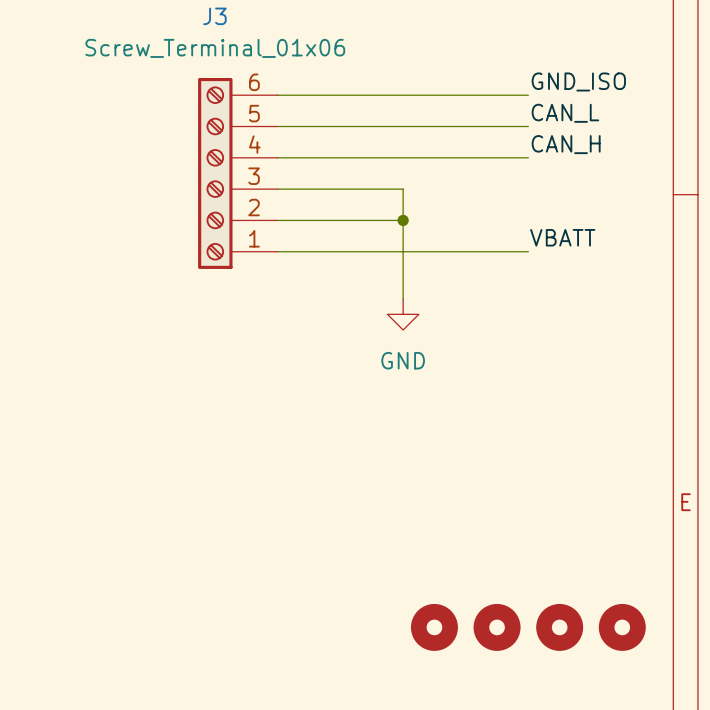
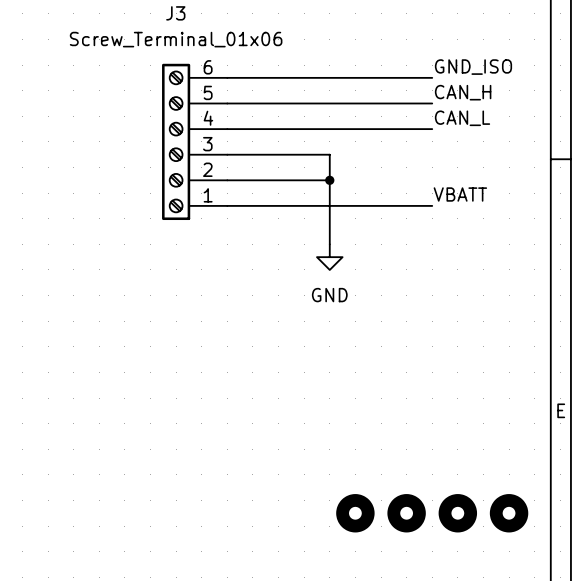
label: CAN_L (565, 113) -> CAN_H (463, 92)
label: CAN_H (566, 144) -> CAN_L (462, 118)

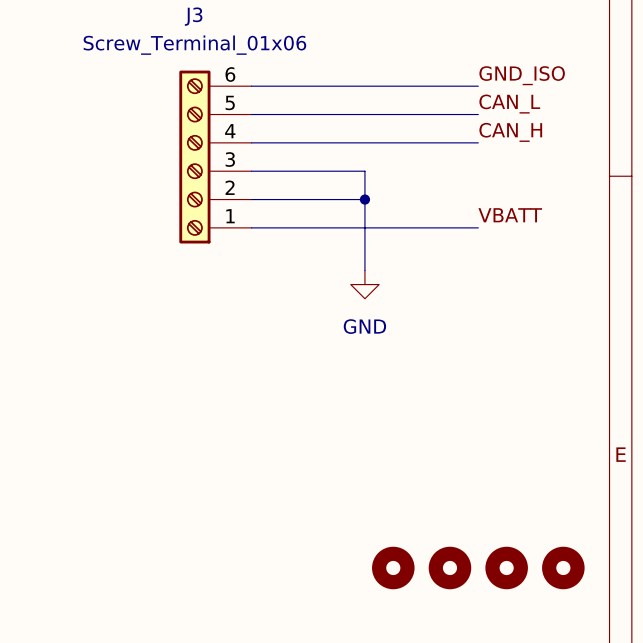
label: CAN_H (463, 92) -> CAN_L (509, 104)
label: CAN_L (462, 118) -> CAN_H (510, 132)

